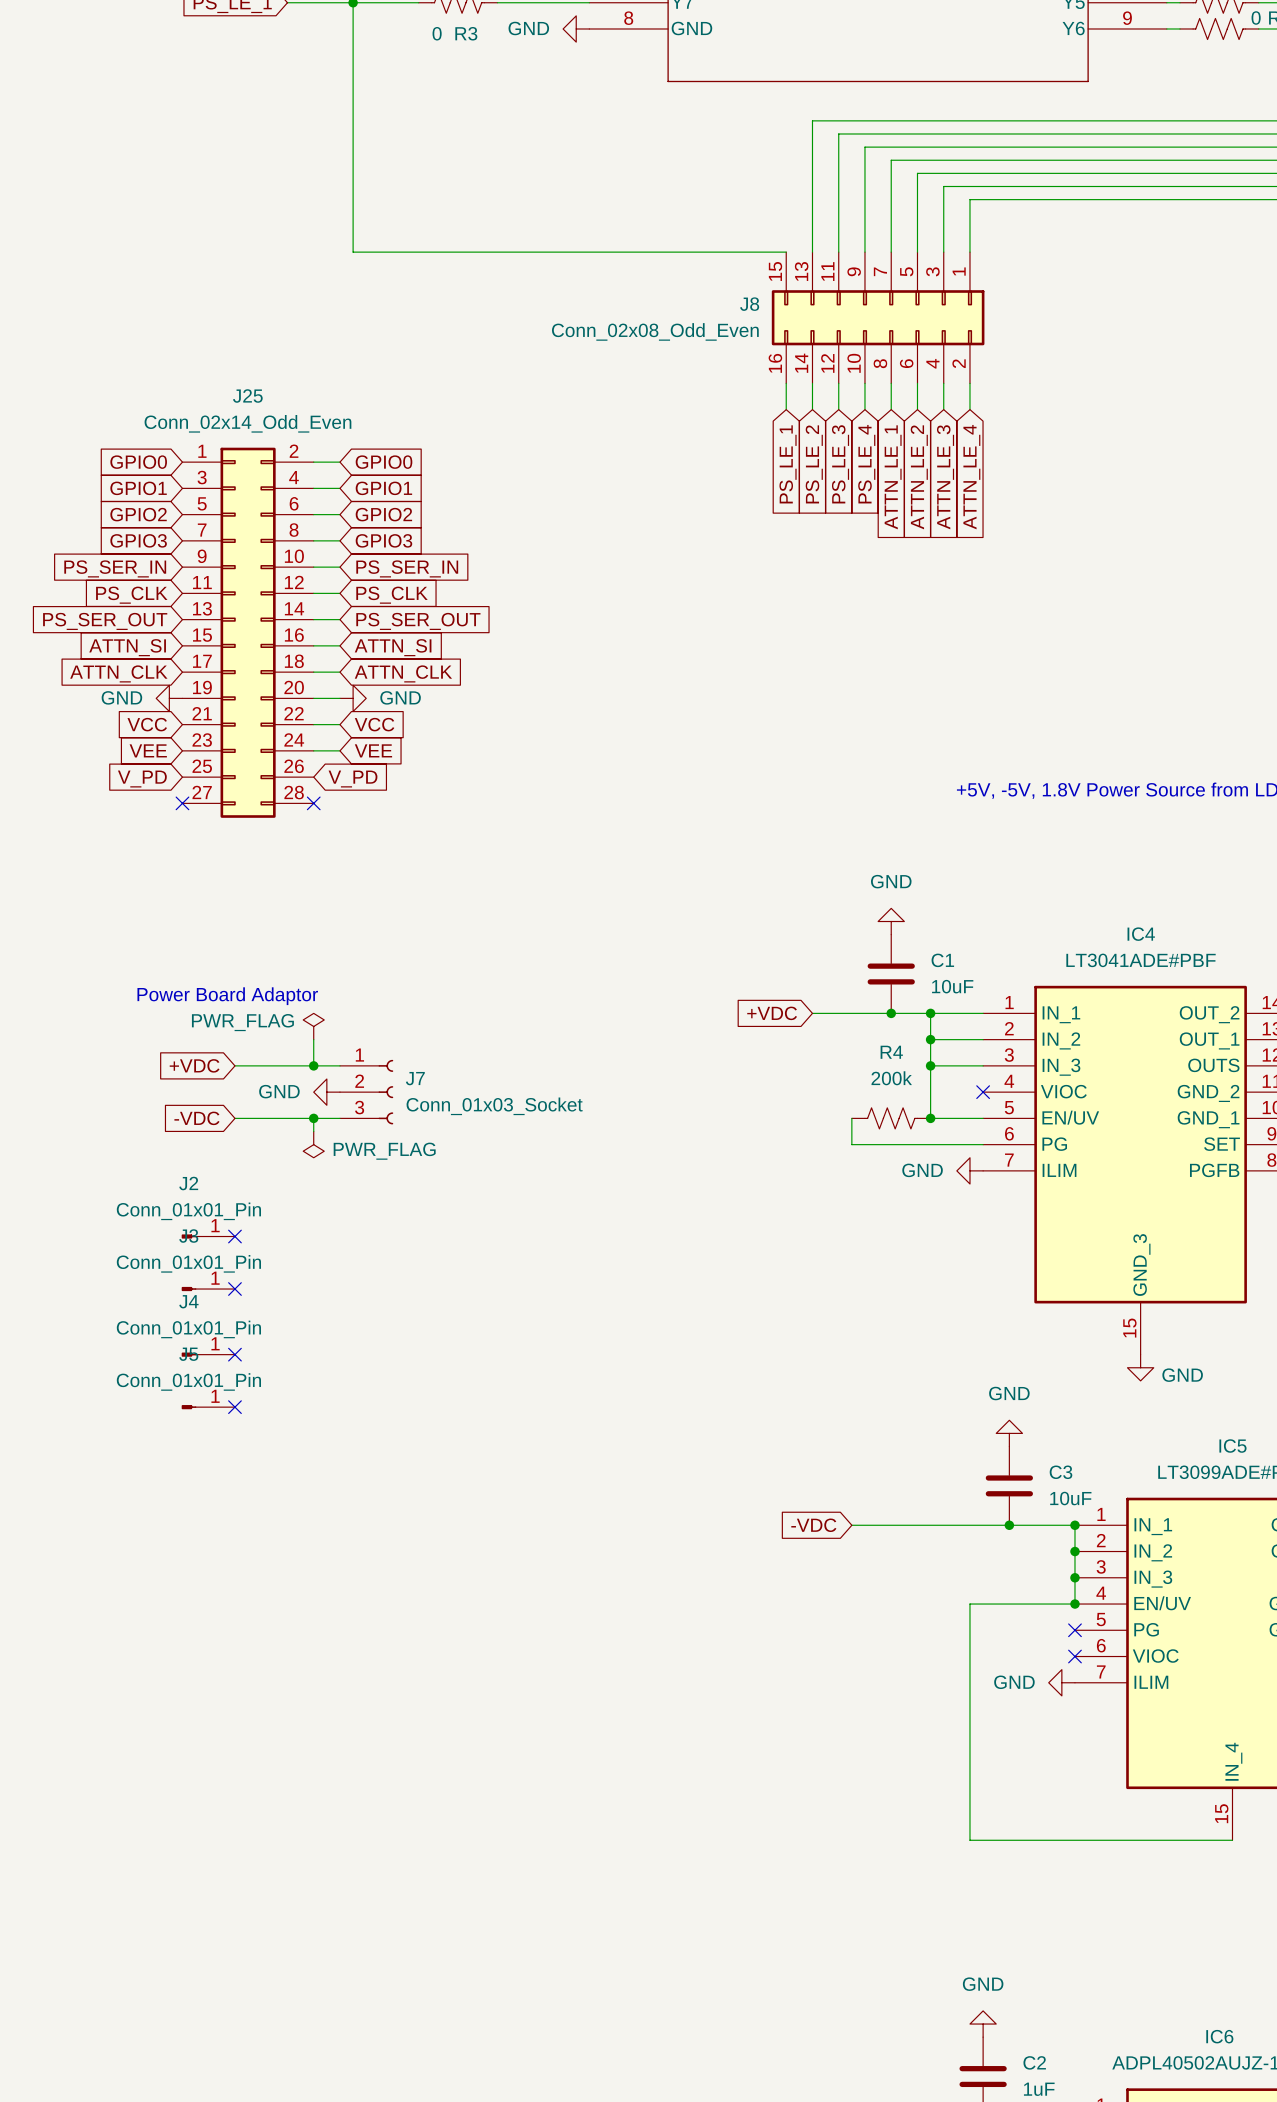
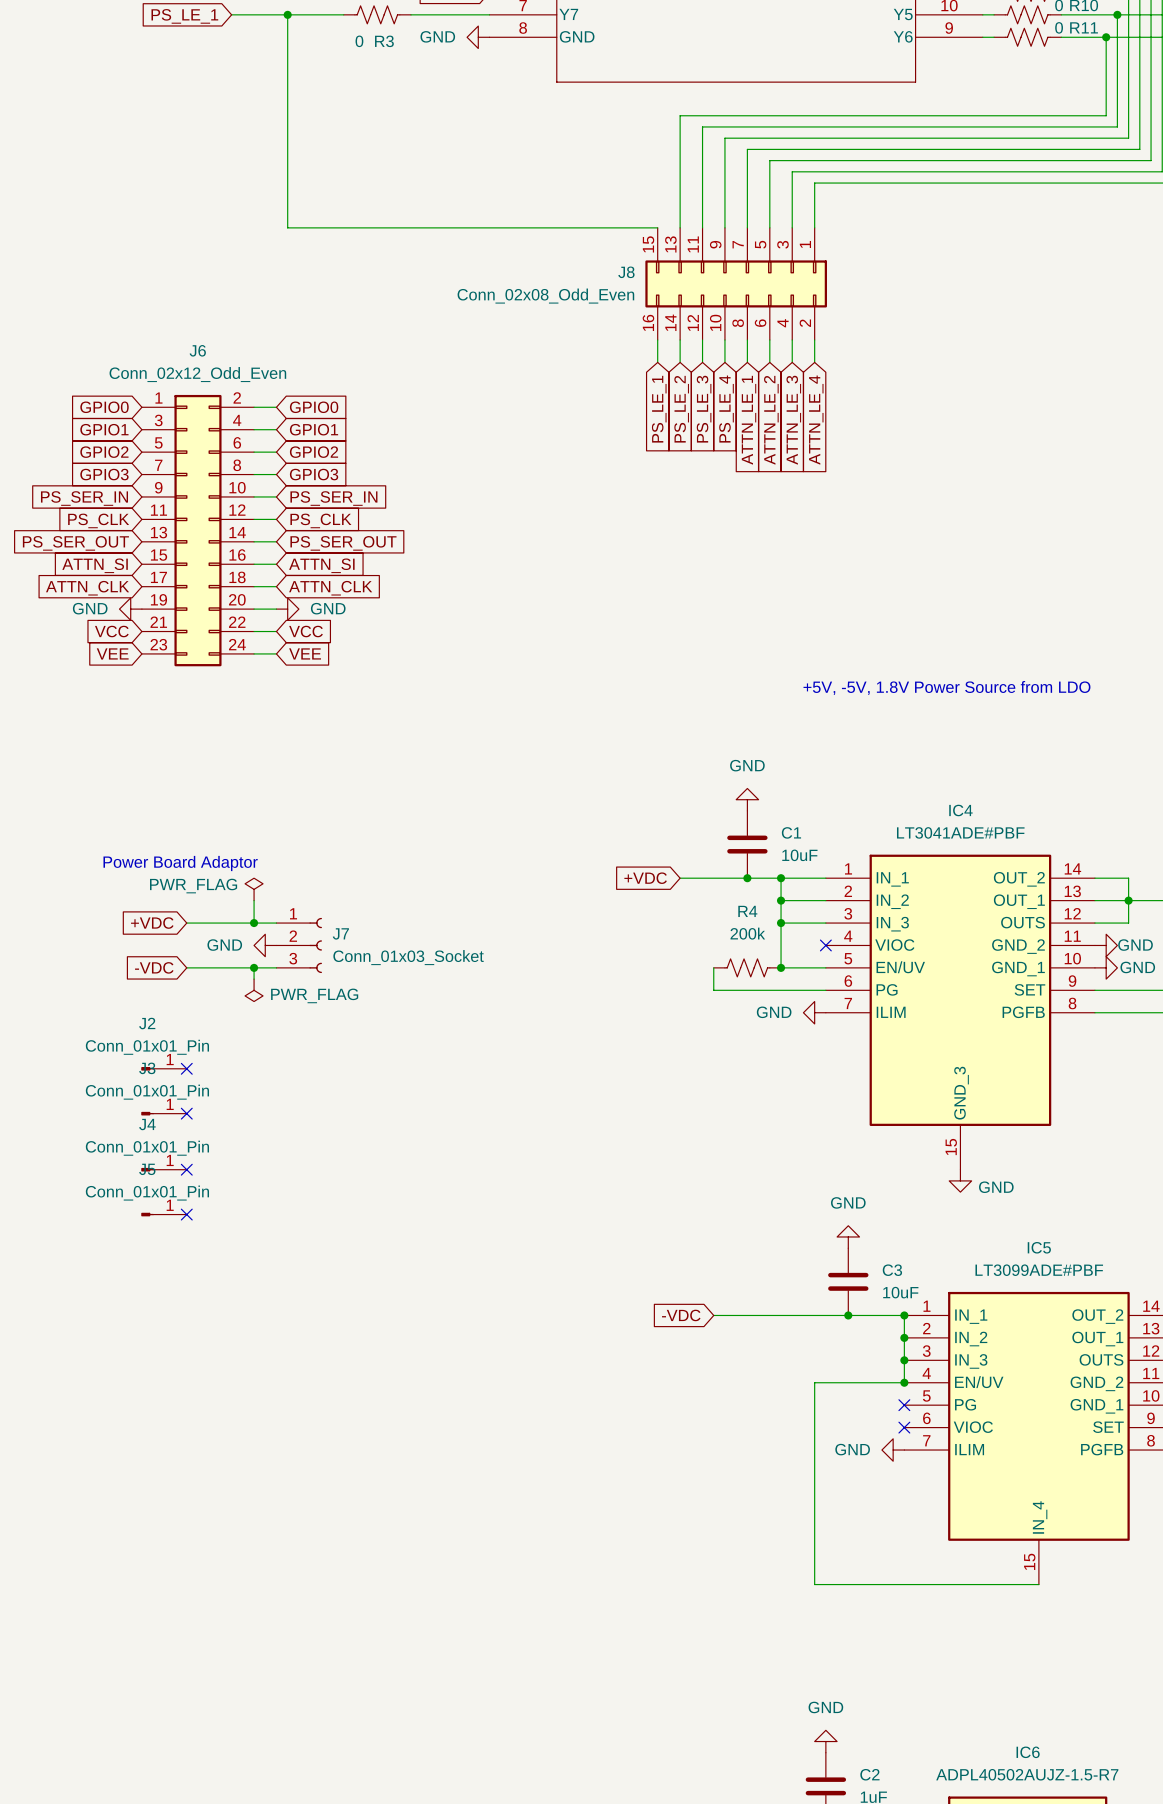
J6: none -> Conn_02x12_Odd_Even (197, 530)
J25: Conn_02x14_Odd_Even (248, 632) -> none
global label: V_PD (142, 779) -> none
global label: V_PD (352, 779) -> none
no-connect mark: (182, 803) -> none
no-connect mark: (313, 803) -> none

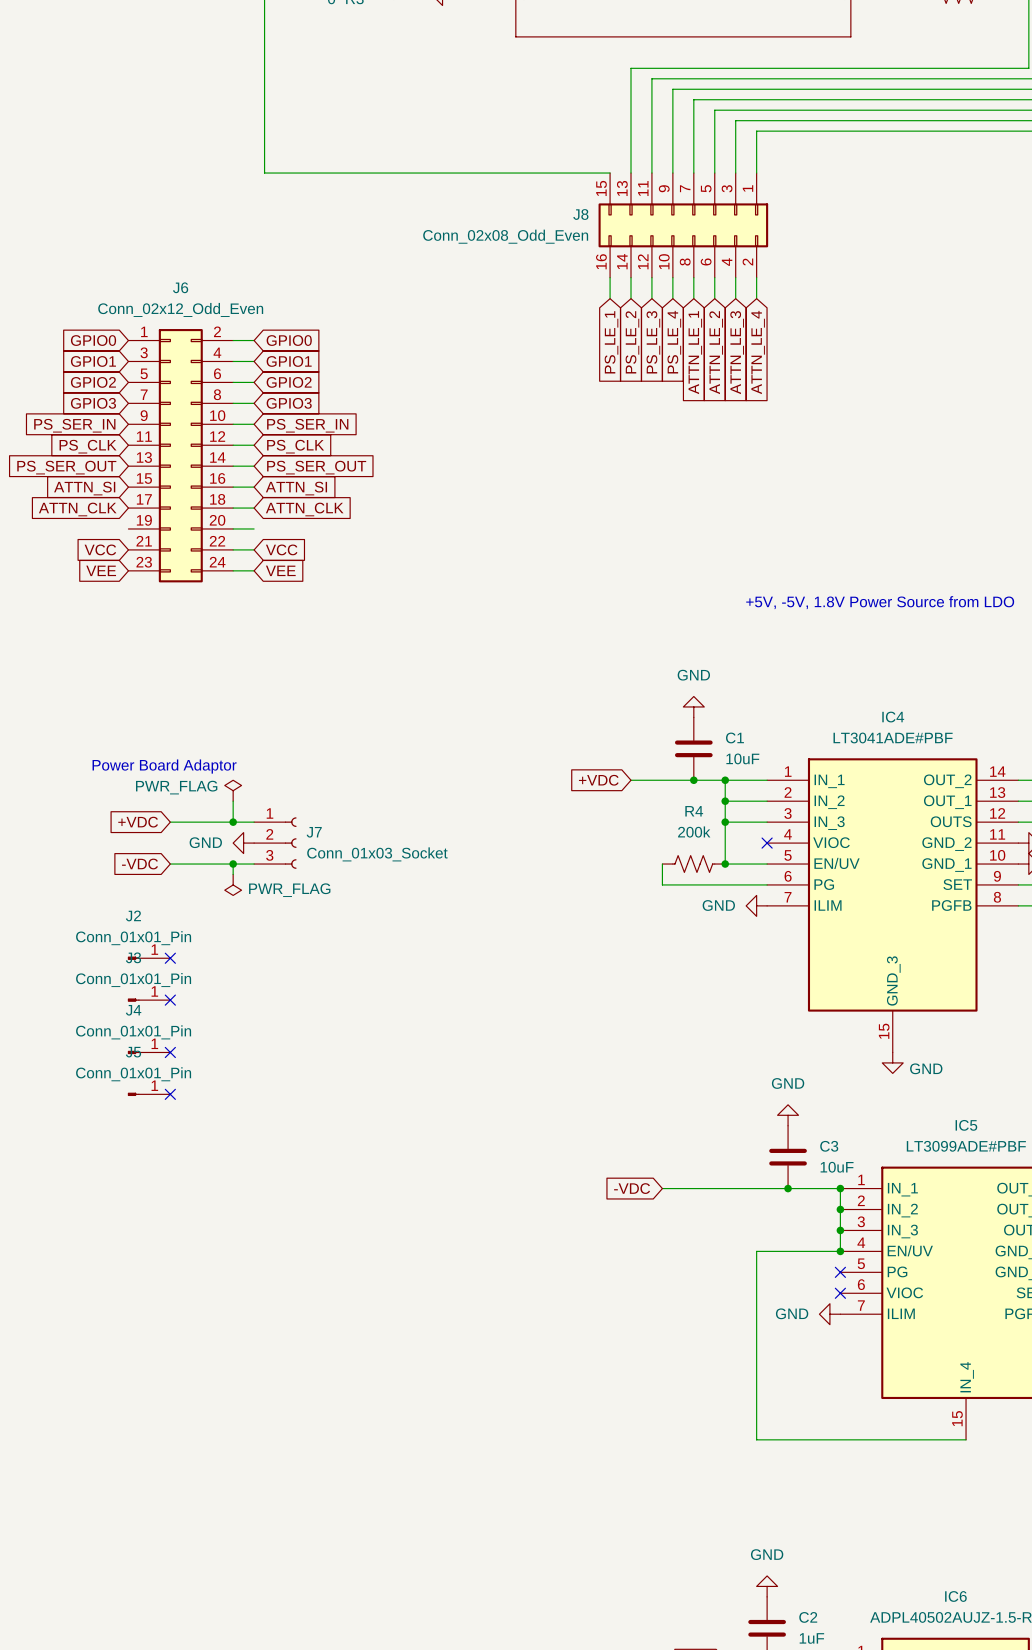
power symbol: GND (130, 609) -> none
power symbol: GND (287, 609) -> none

